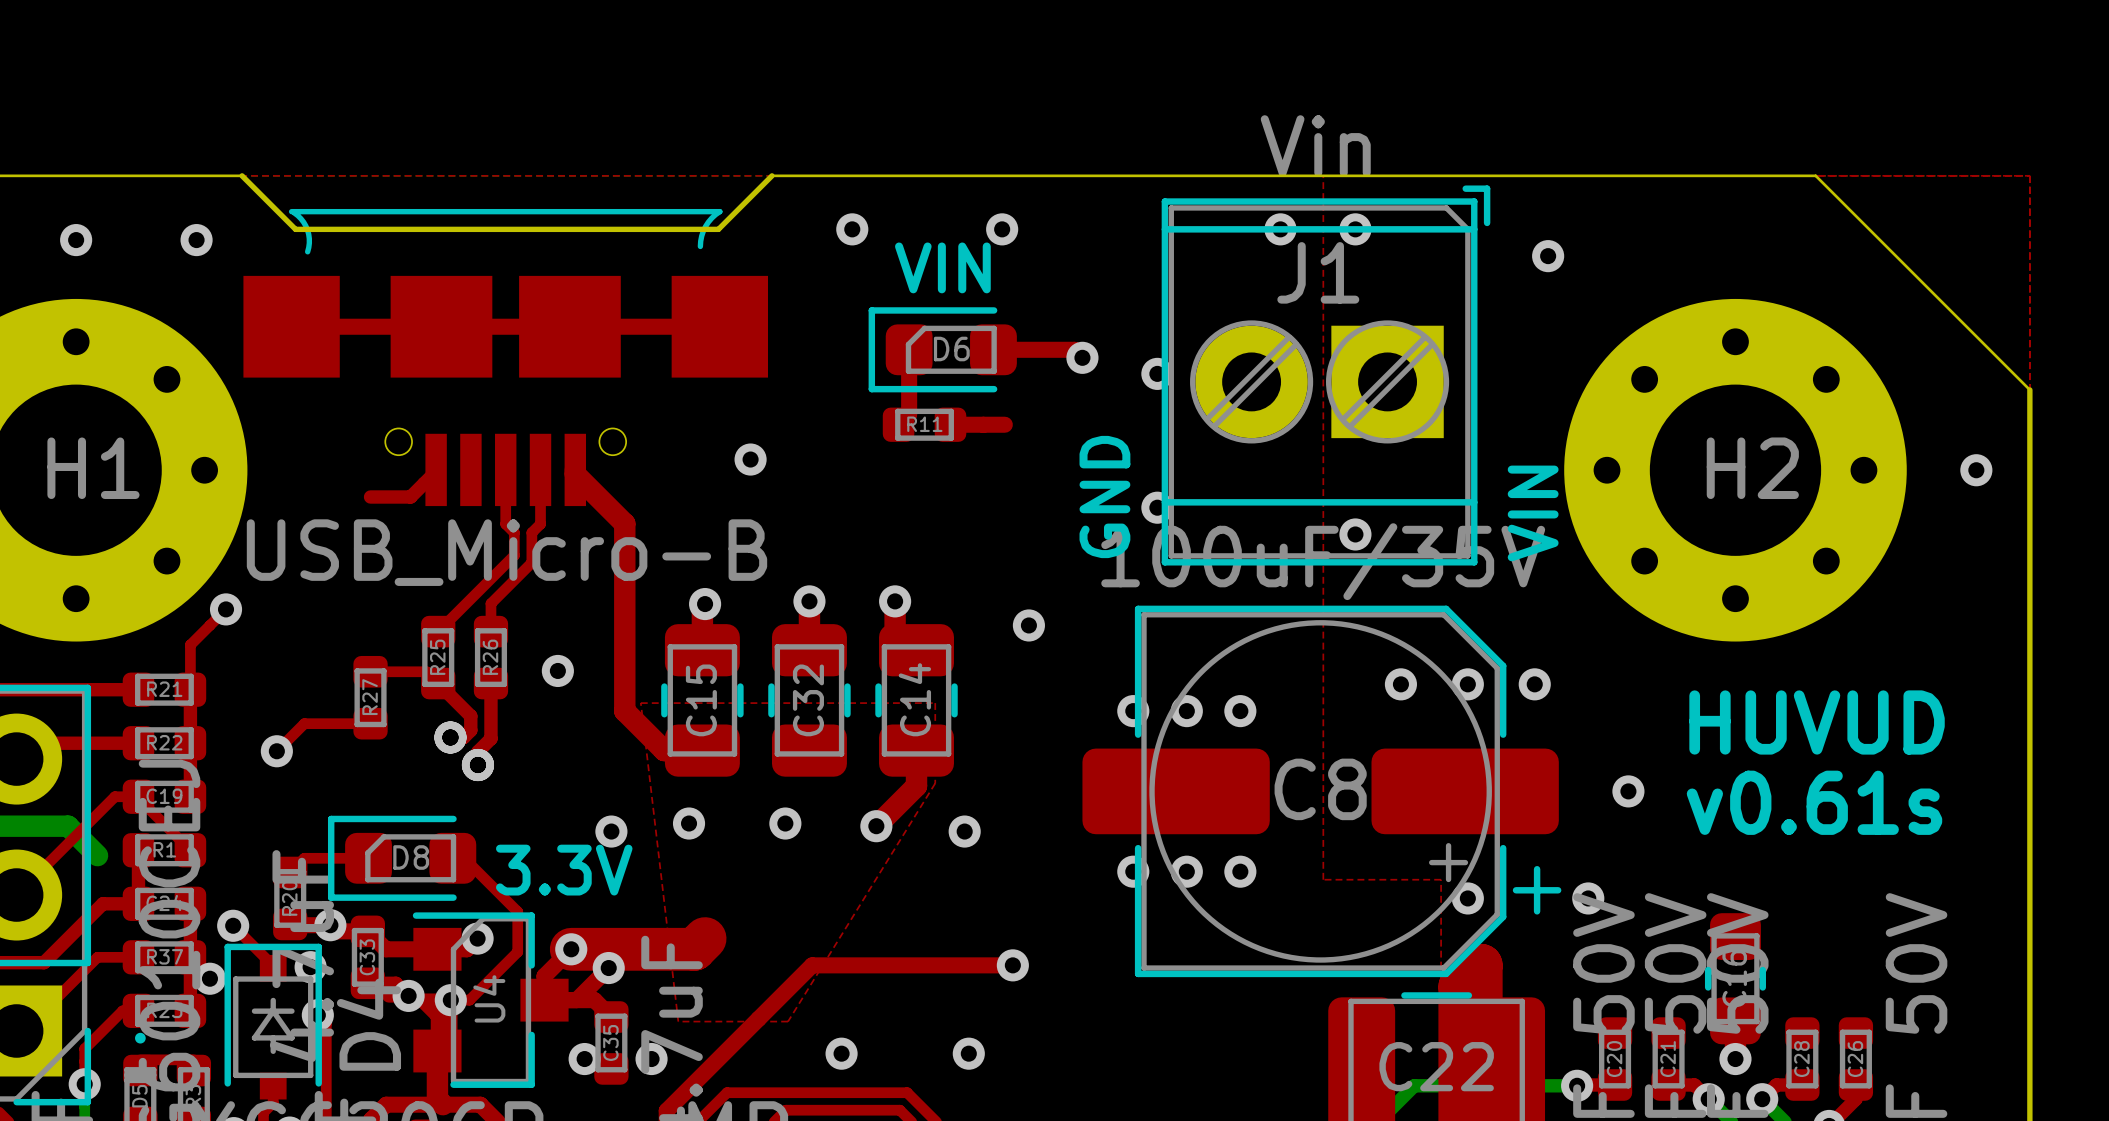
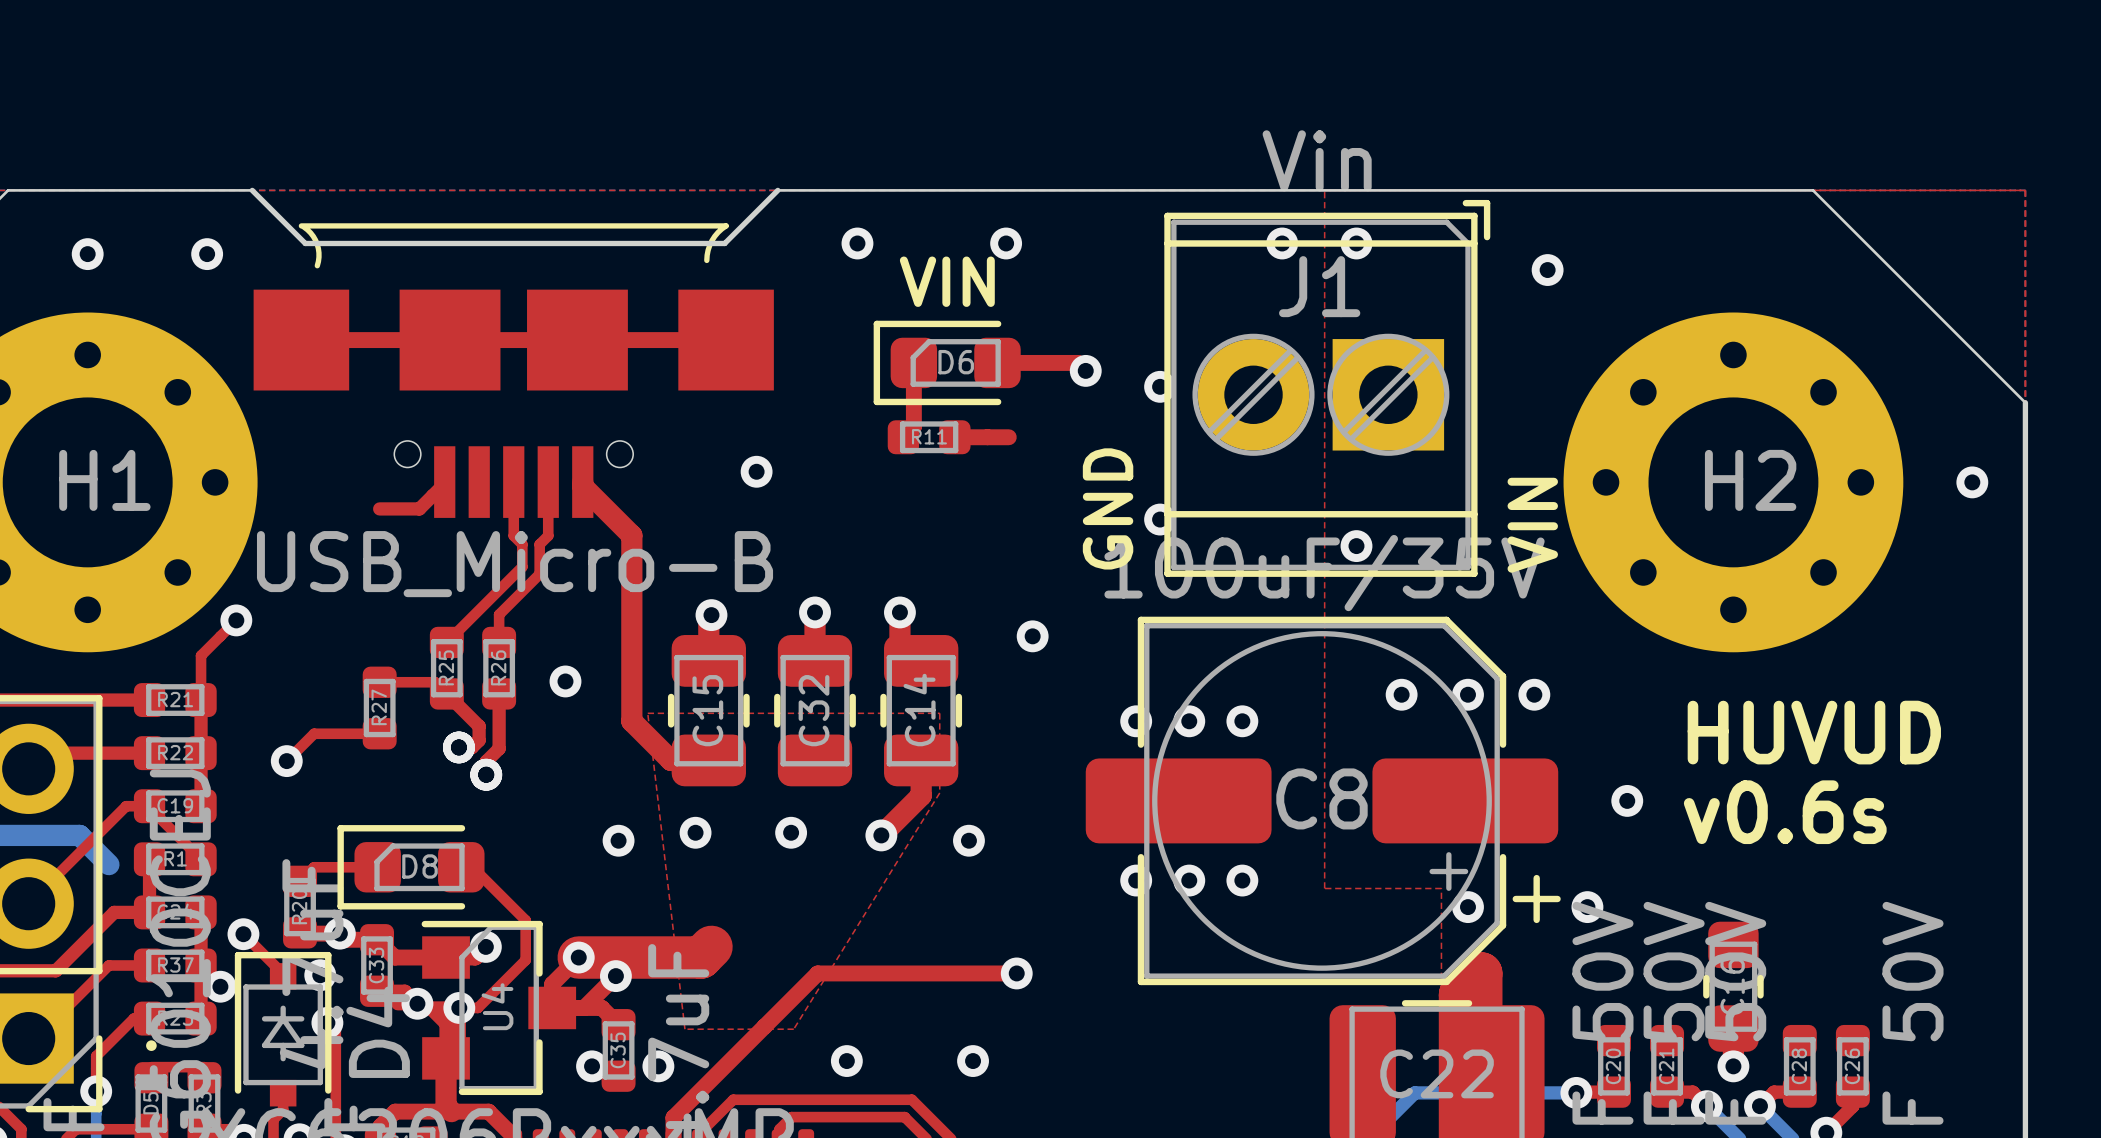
text: v0.61s (1814, 802) -> v0.6s (1785, 812)
text: 3.3V (564, 870) -> none

